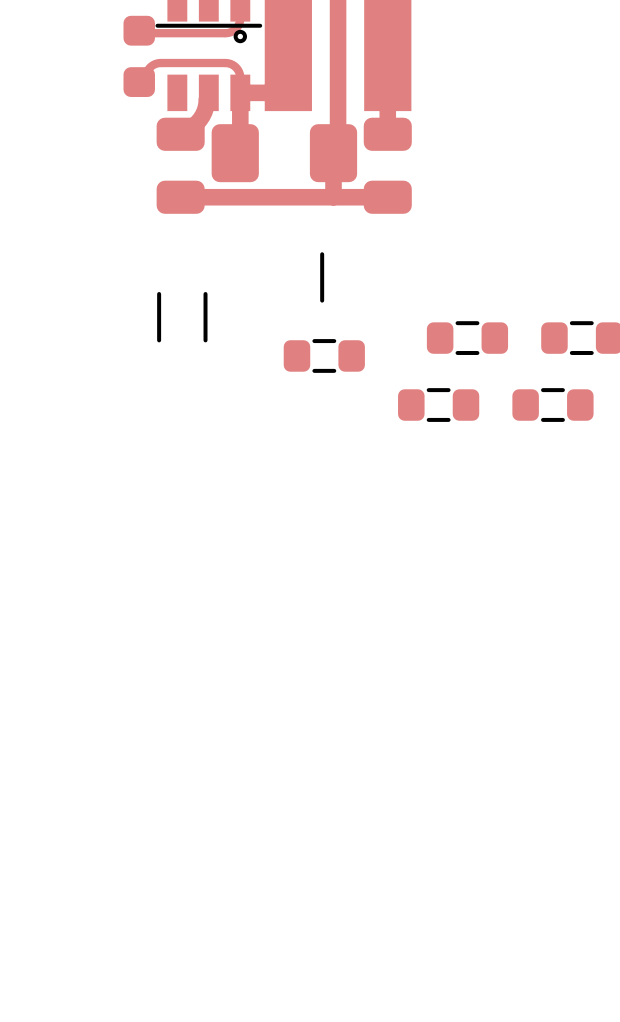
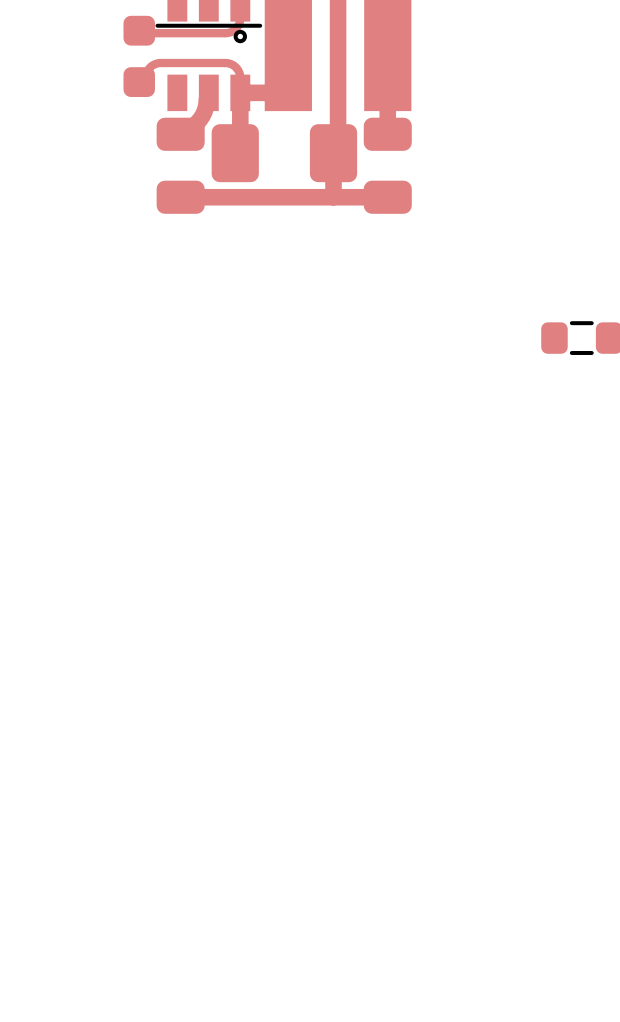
drawing: [320, 252, 325, 303] -> none
drawing: [157, 292, 208, 343] -> none
part: (467, 338) -> none
part: (324, 355) -> none
part: (438, 405) -> none
part: (552, 405) -> none

